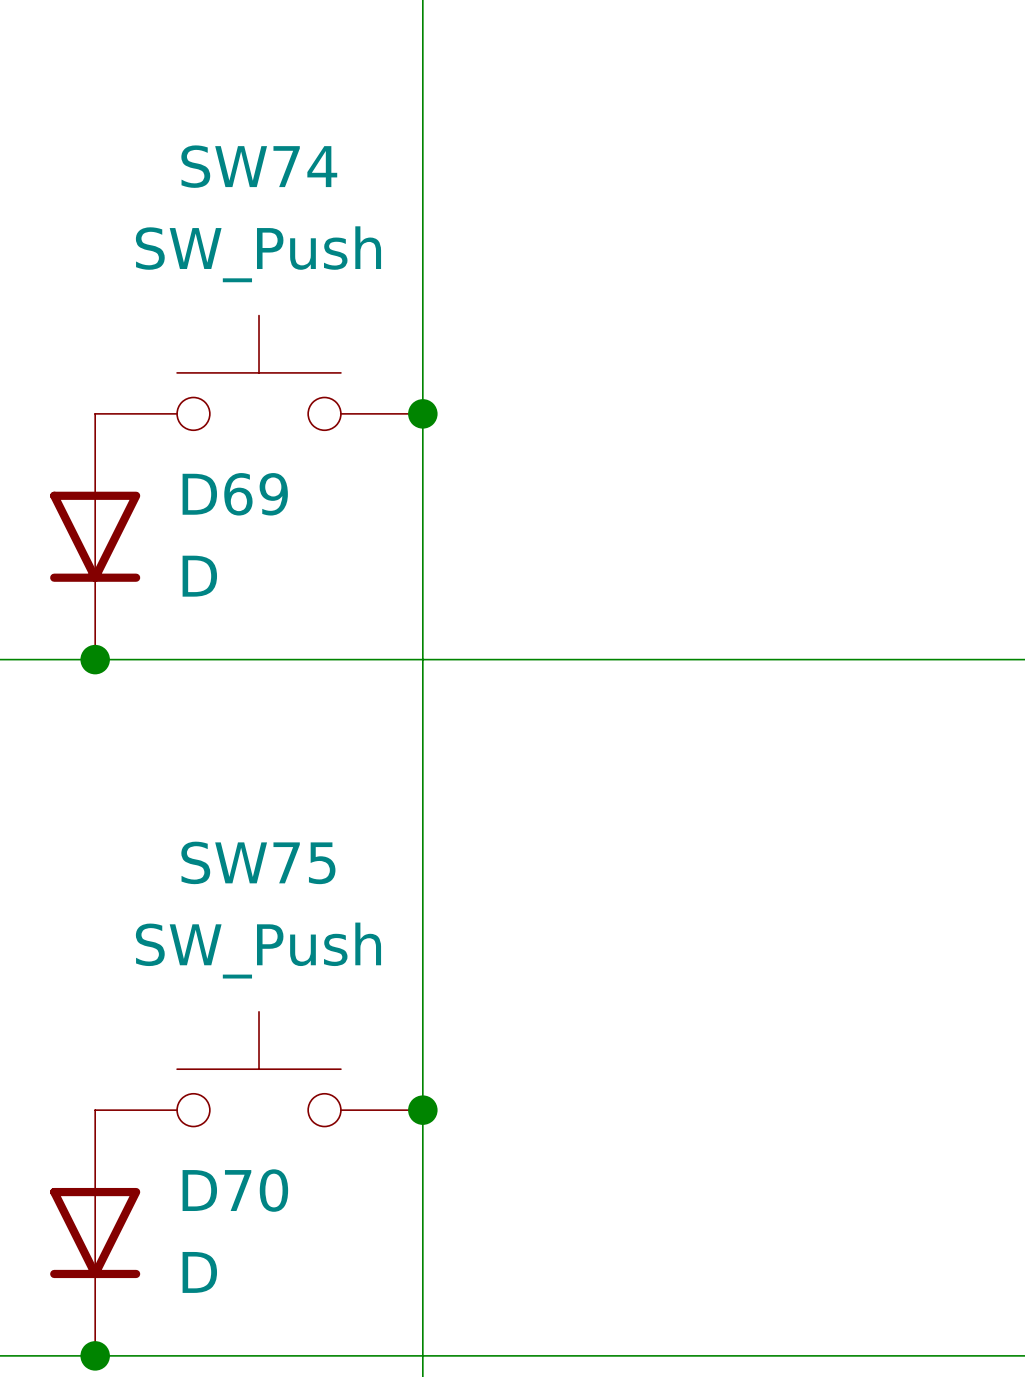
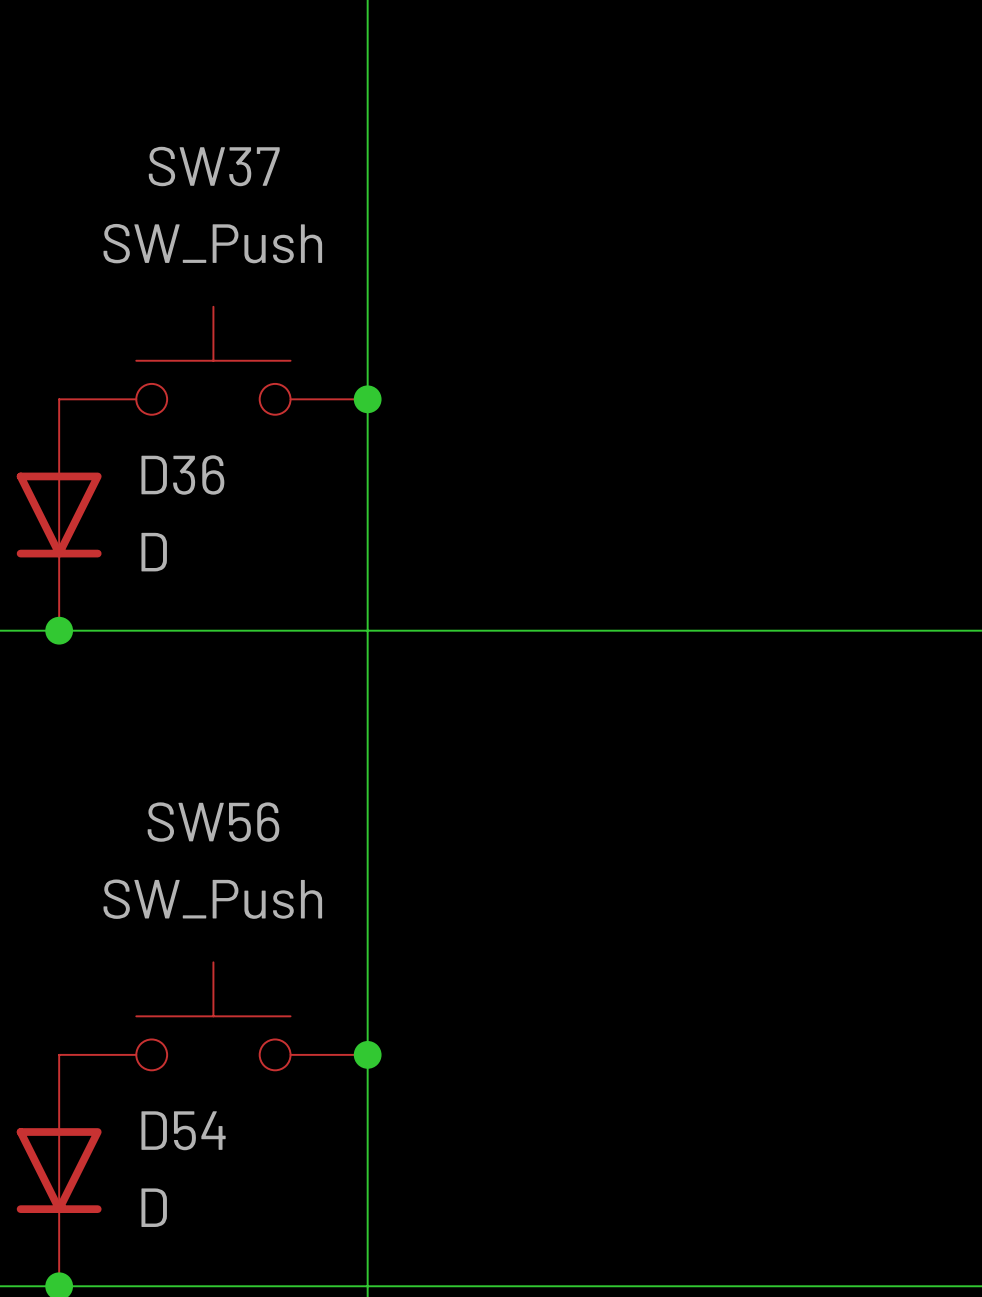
SW74 name: SW74 (259, 166) -> SW37 (214, 166)
D69 name: D69 (235, 494) -> D36 (182, 475)
SW75 name: SW75 (258, 862) -> SW56 (213, 822)
D70 name: D70 (235, 1190) -> D54 (183, 1130)

